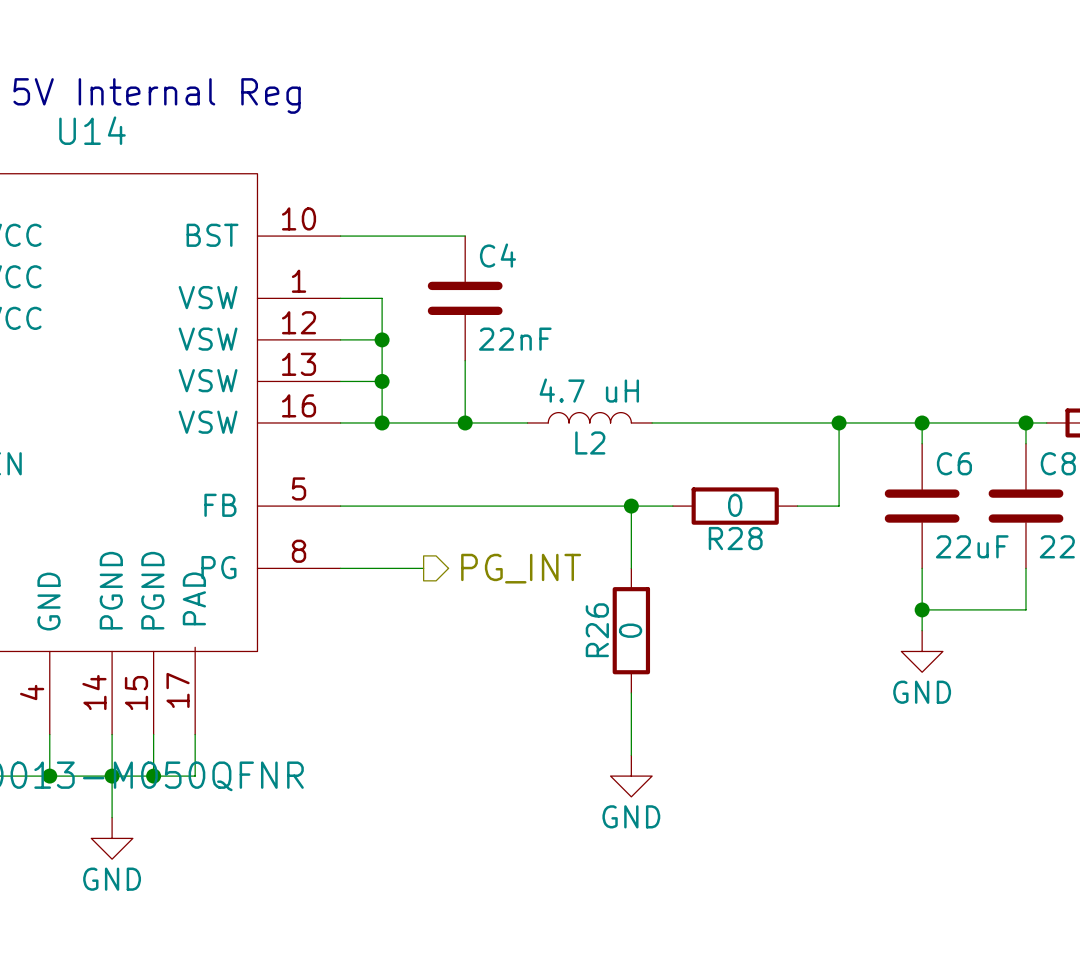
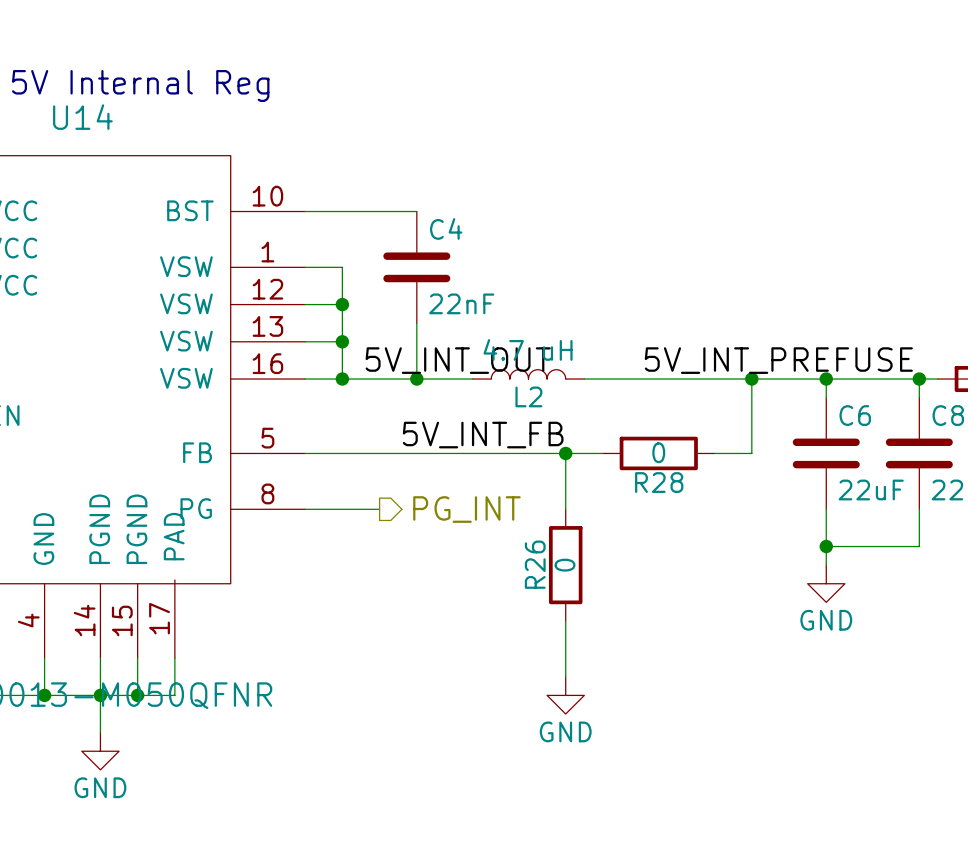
label: none -> 5V_INT_OUT (458, 360)
label: none -> 5V_INT_PREFUSE (778, 360)
label: none -> 5V_INT_FB (483, 435)

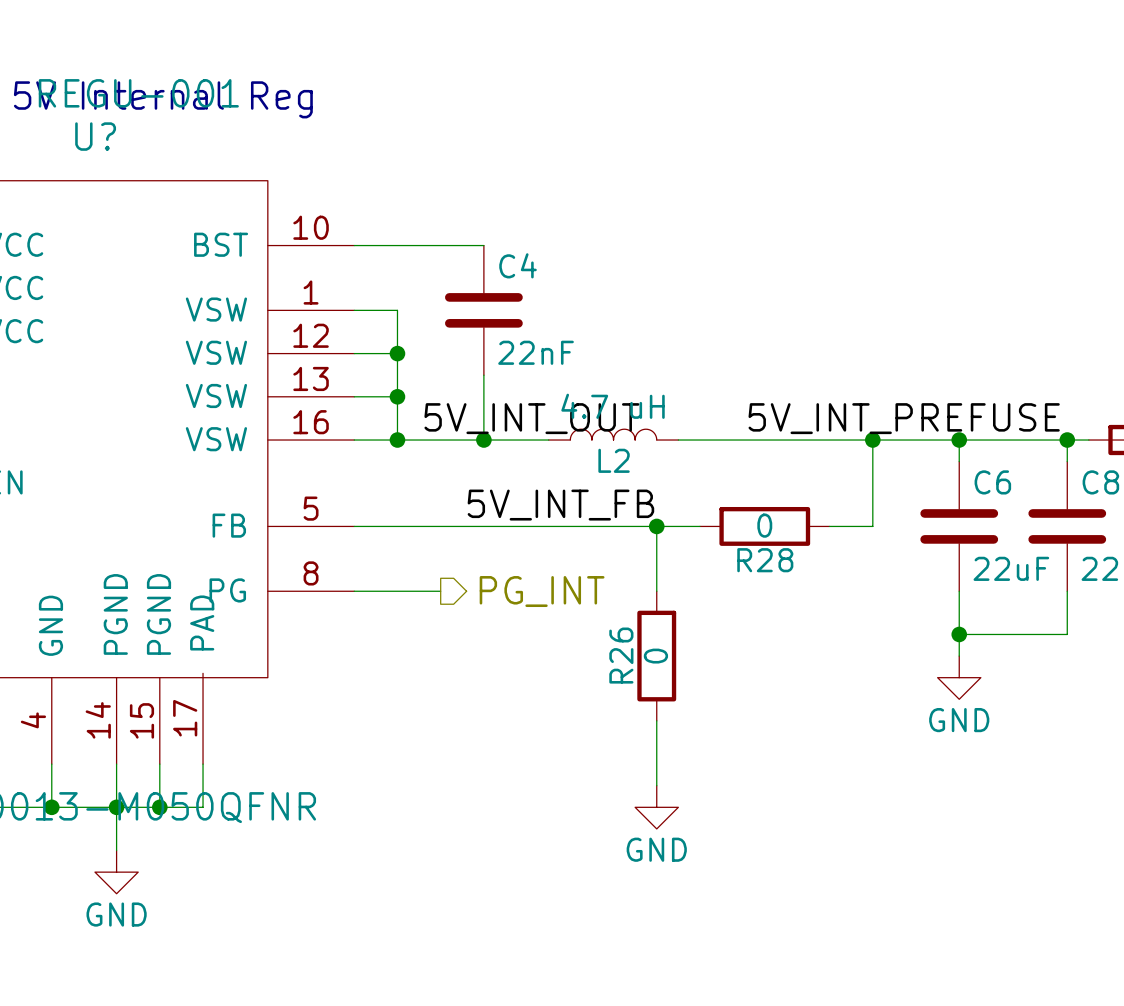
U14 text: none -> REGU-001 (138, 93)
U14 name: U14 (82, 117) -> U? (95, 136)

